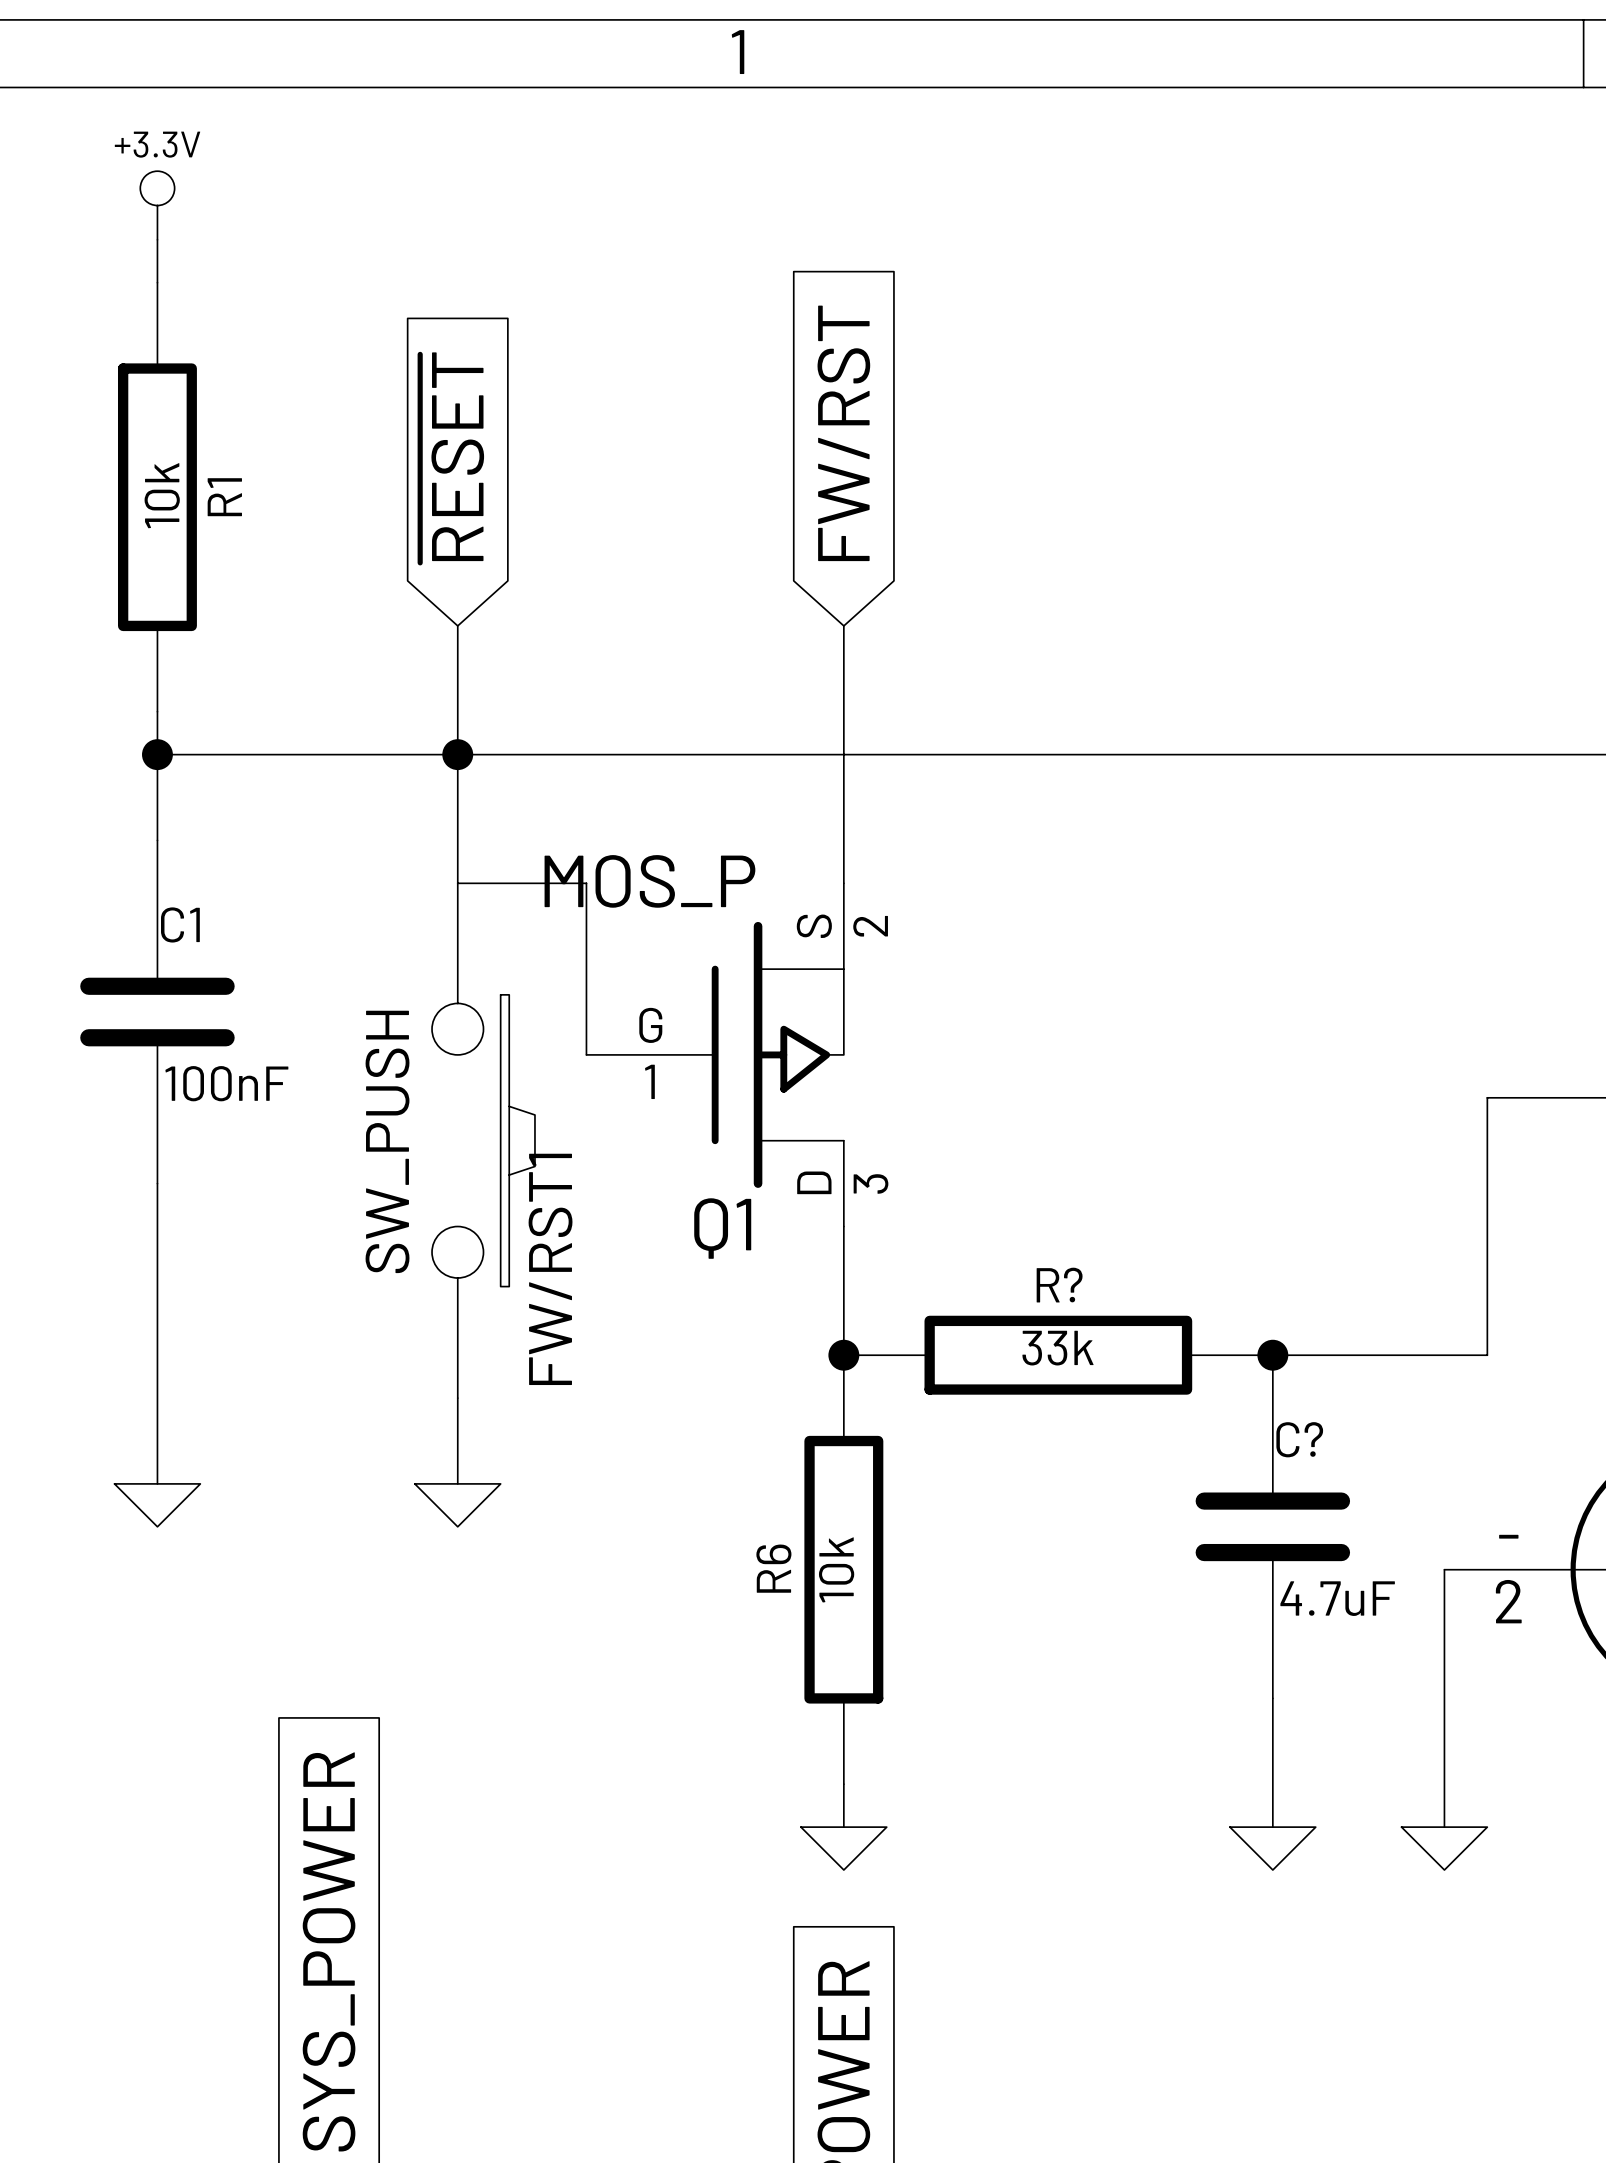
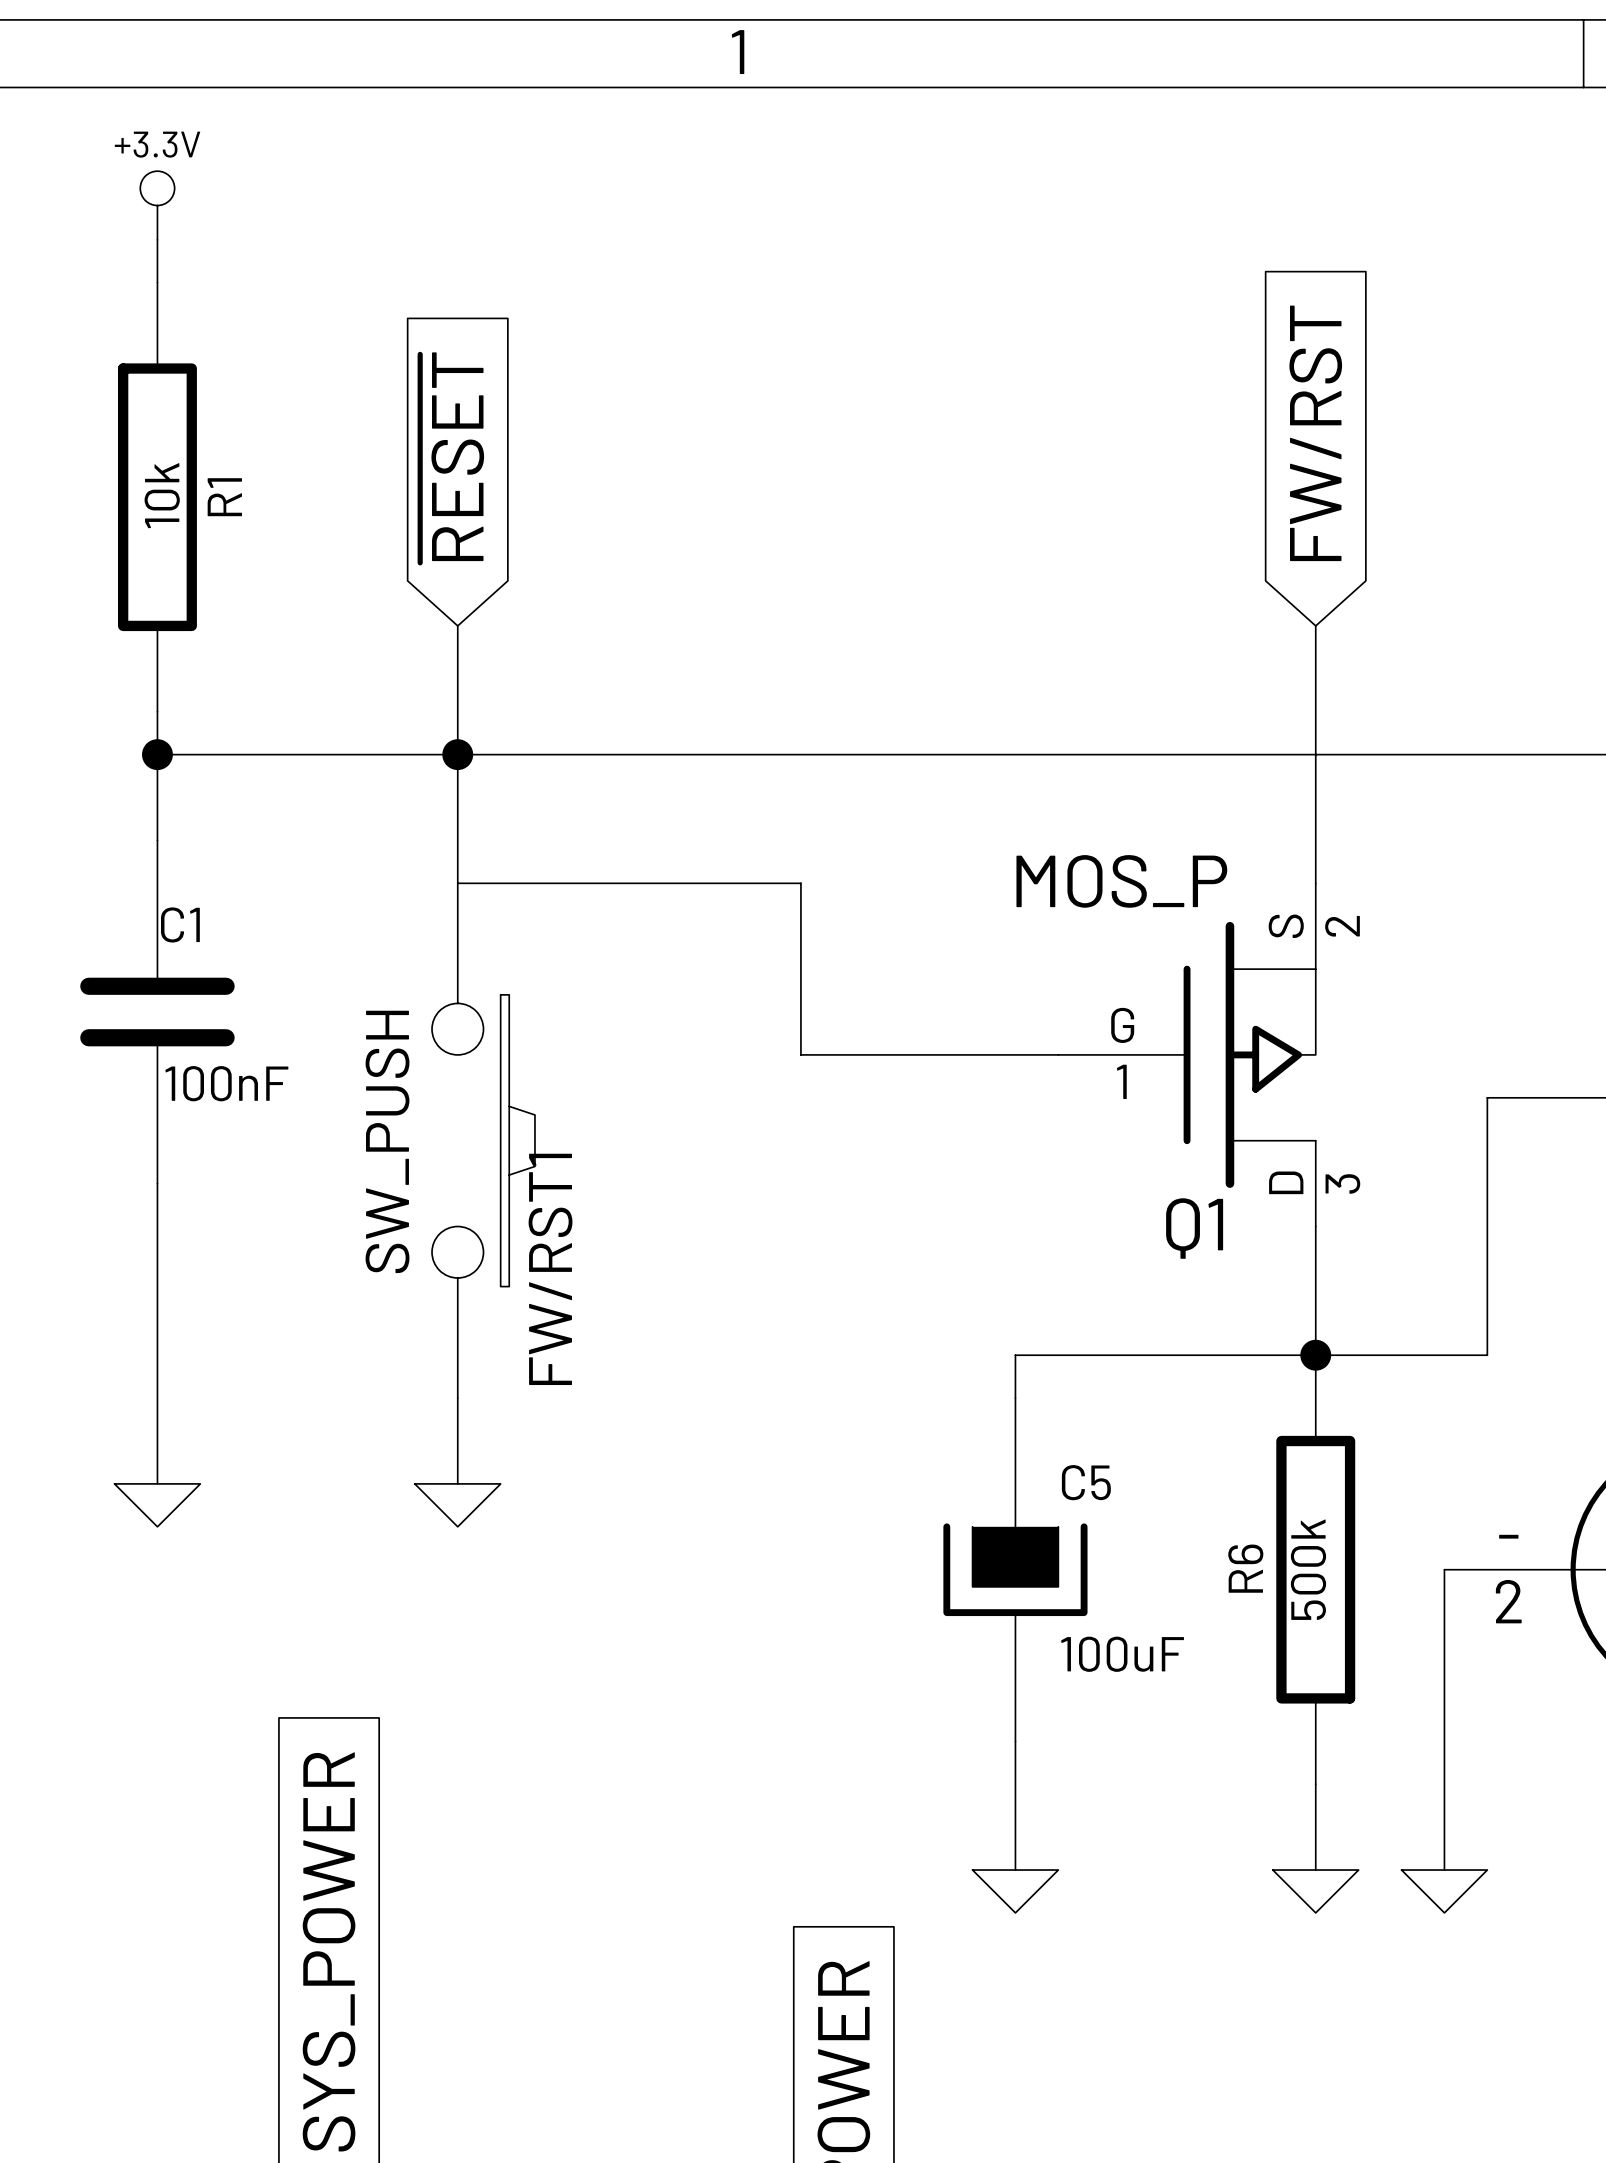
global label position: FW/RST (843, 433) -> FW/RST (1315, 433)
wire: (843, 625) (843, 883) -> (1315, 625) (1315, 883)
wire: (586, 883) (586, 1054) -> (586, 883) (800, 883) (800, 1054) (1058, 1054)
Q1 position: (715, 1054) -> (1187, 1054)
wire: (843, 1226) (843, 1355) -> (1315, 1226) (1315, 1355)
junction: (843, 1355) -> none
R?: 33k (1058, 1355) -> none
wire: none -> (1272, 1355) (1015, 1355) (1015, 1398)
junction position: (1272, 1355) -> (1315, 1355)
C?: 4.7uF (1272, 1526) -> none
R6 value: 10k (836, 1569) -> 500k (1308, 1569)
R6 position: (843, 1569) -> (1315, 1569)
C5: none -> 100uF (1015, 1569)
wire: (1272, 1698) (1272, 1827) -> (1015, 1741) (1015, 1870)
wire: (843, 1784) (843, 1827) -> (1444, 1827) (1444, 1870)
wire: none -> (1315, 1784) (1315, 1870)
power symbol: (843, 1848) -> none
power symbol position: (1272, 1848) -> (1315, 1891)
power symbol position: (1444, 1848) -> (1444, 1891)
power symbol: none -> (1015, 1891)

